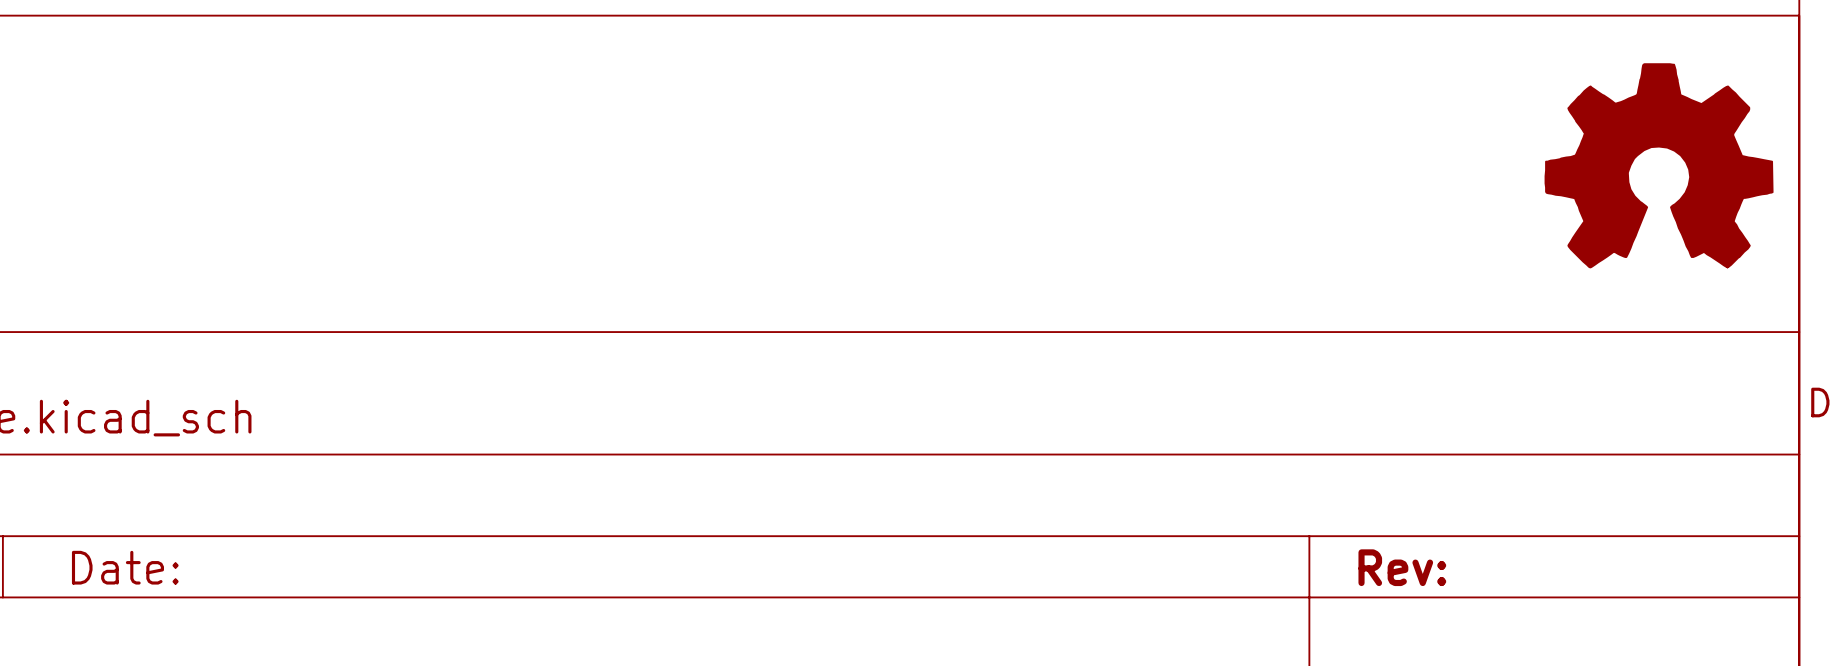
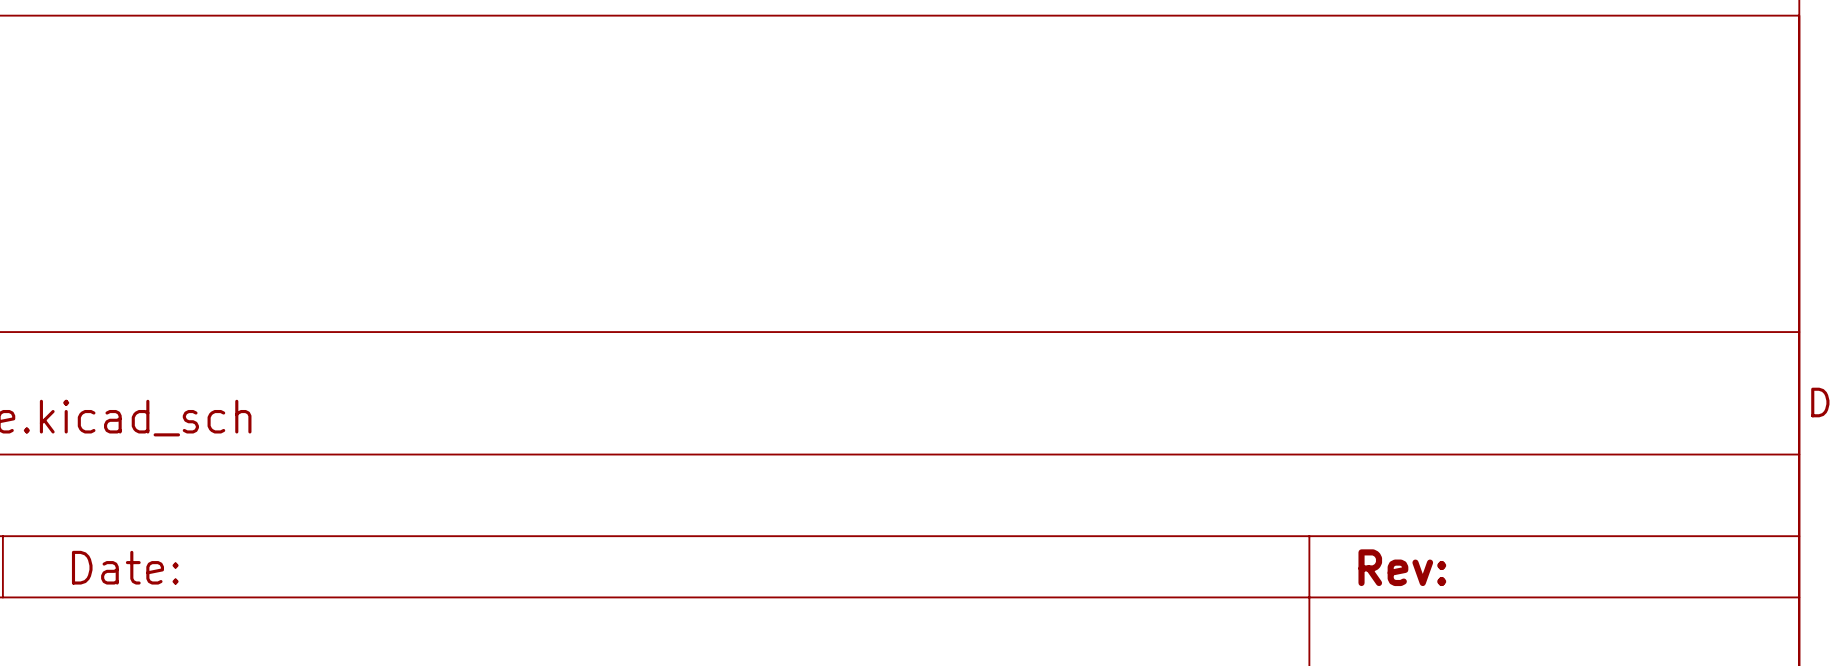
power symbol: (1659, 165) -> none

